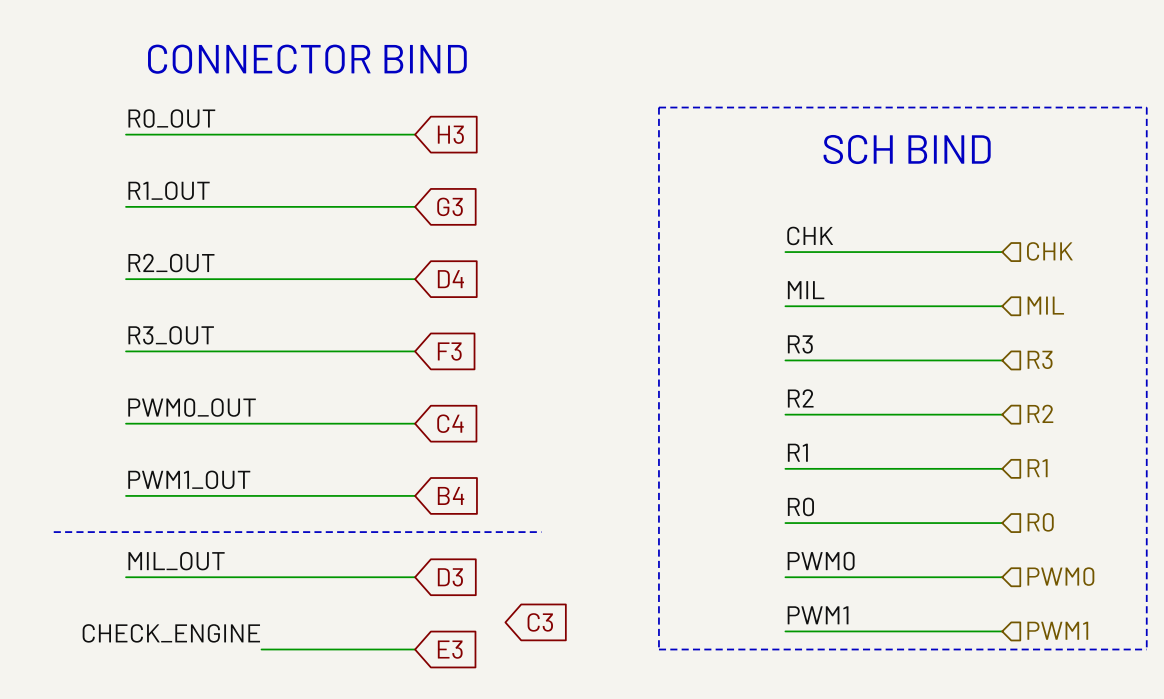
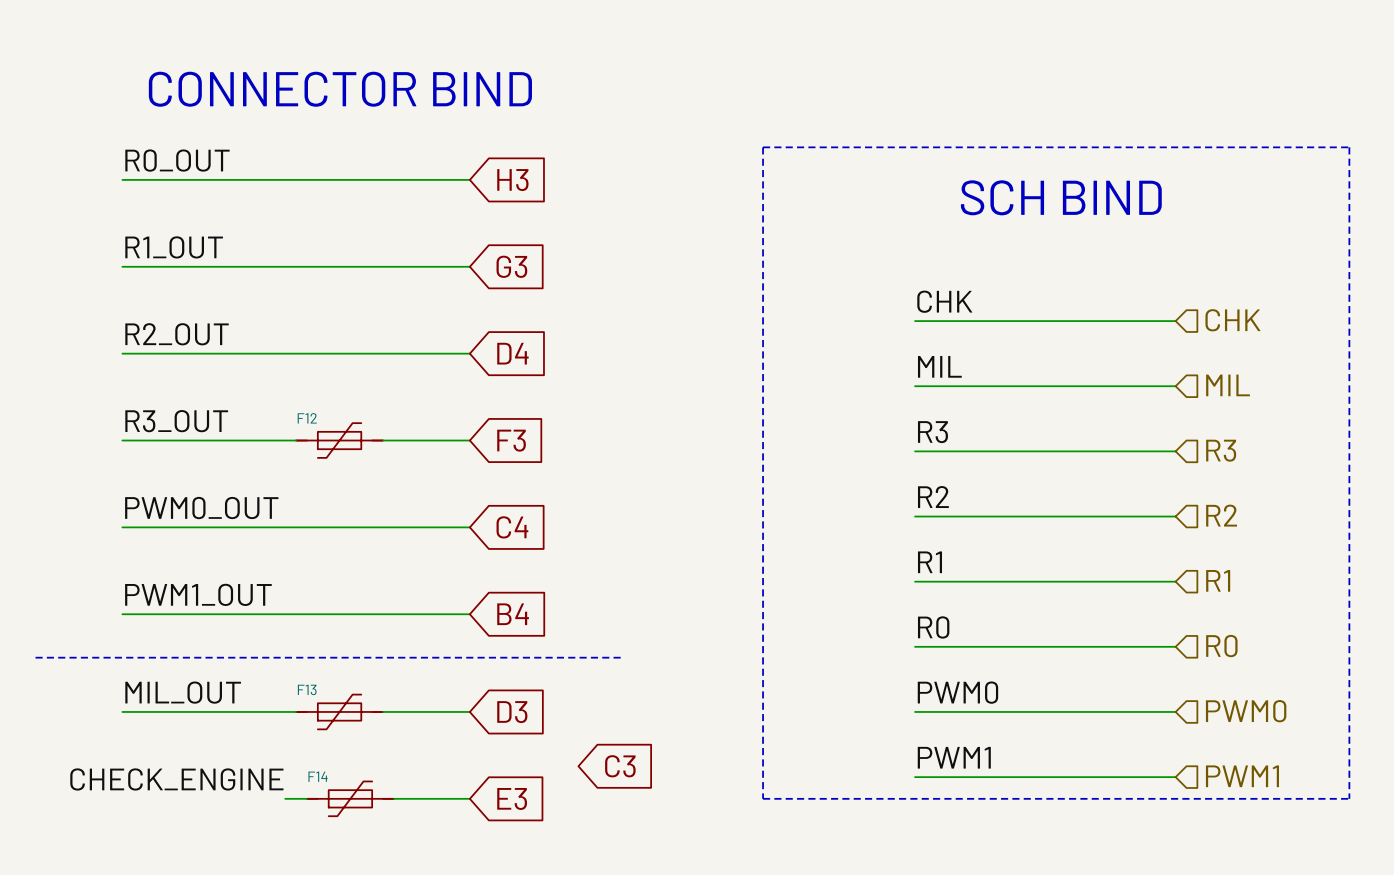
F12: none -> (339, 440)
F13: none -> (339, 711)
F14: none -> (350, 798)

